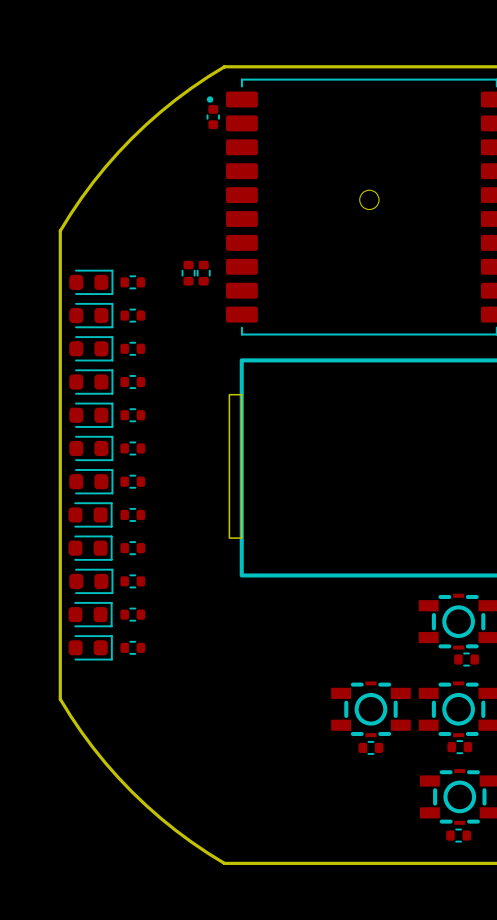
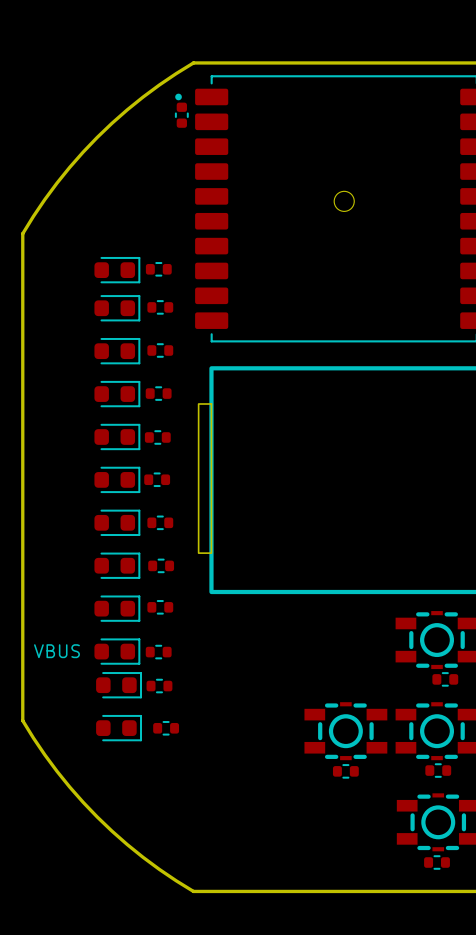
part: none -> (117, 270)
part: none -> (158, 269)
part: (188, 273) -> none
part: (203, 273) -> none
part: (91, 282) -> none
part: (132, 282) -> none
part: none -> (160, 307)
part: none -> (117, 308)
part: (91, 315) -> none
part: (132, 315) -> none
part: none -> (117, 351)
part: none -> (160, 350)
part: (91, 348) -> none
part: (132, 348) -> none
part: (91, 382) -> none
part: (132, 382) -> none
part: none -> (158, 393)
part: none -> (117, 394)
part: (91, 415) -> none
part: (132, 415) -> none
part: none -> (117, 436)
part: none -> (157, 437)
part: (91, 448) -> none
part: (132, 448) -> none
part: none -> (117, 479)
part: none -> (157, 479)
part: (91, 481) -> none
part: (132, 481) -> none
part: none -> (117, 522)
part: none -> (160, 522)
part: (90, 514) -> none
part: (132, 514) -> none
part: (90, 548) -> none
part: (132, 548) -> none
part: none -> (117, 565)
part: none -> (161, 565)
part: (91, 581) -> none
part: (132, 581) -> none
part: none -> (160, 607)
part: none -> (117, 608)
part: (90, 614) -> none
part: (132, 614) -> none
text: none -> VBUS (56, 651)
part: none -> (117, 651)
part: none -> (158, 652)
part: (90, 647) -> none
part: (132, 647) -> none
part: none -> (119, 685)
part: none -> (159, 686)
part: none -> (119, 728)
part: none -> (166, 728)

